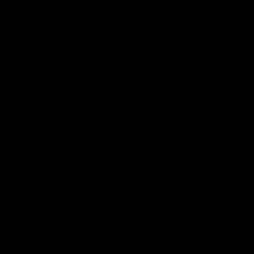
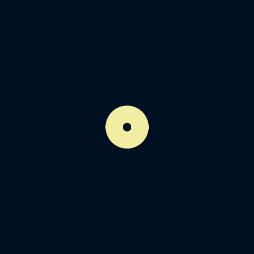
part: none -> (127, 127)

